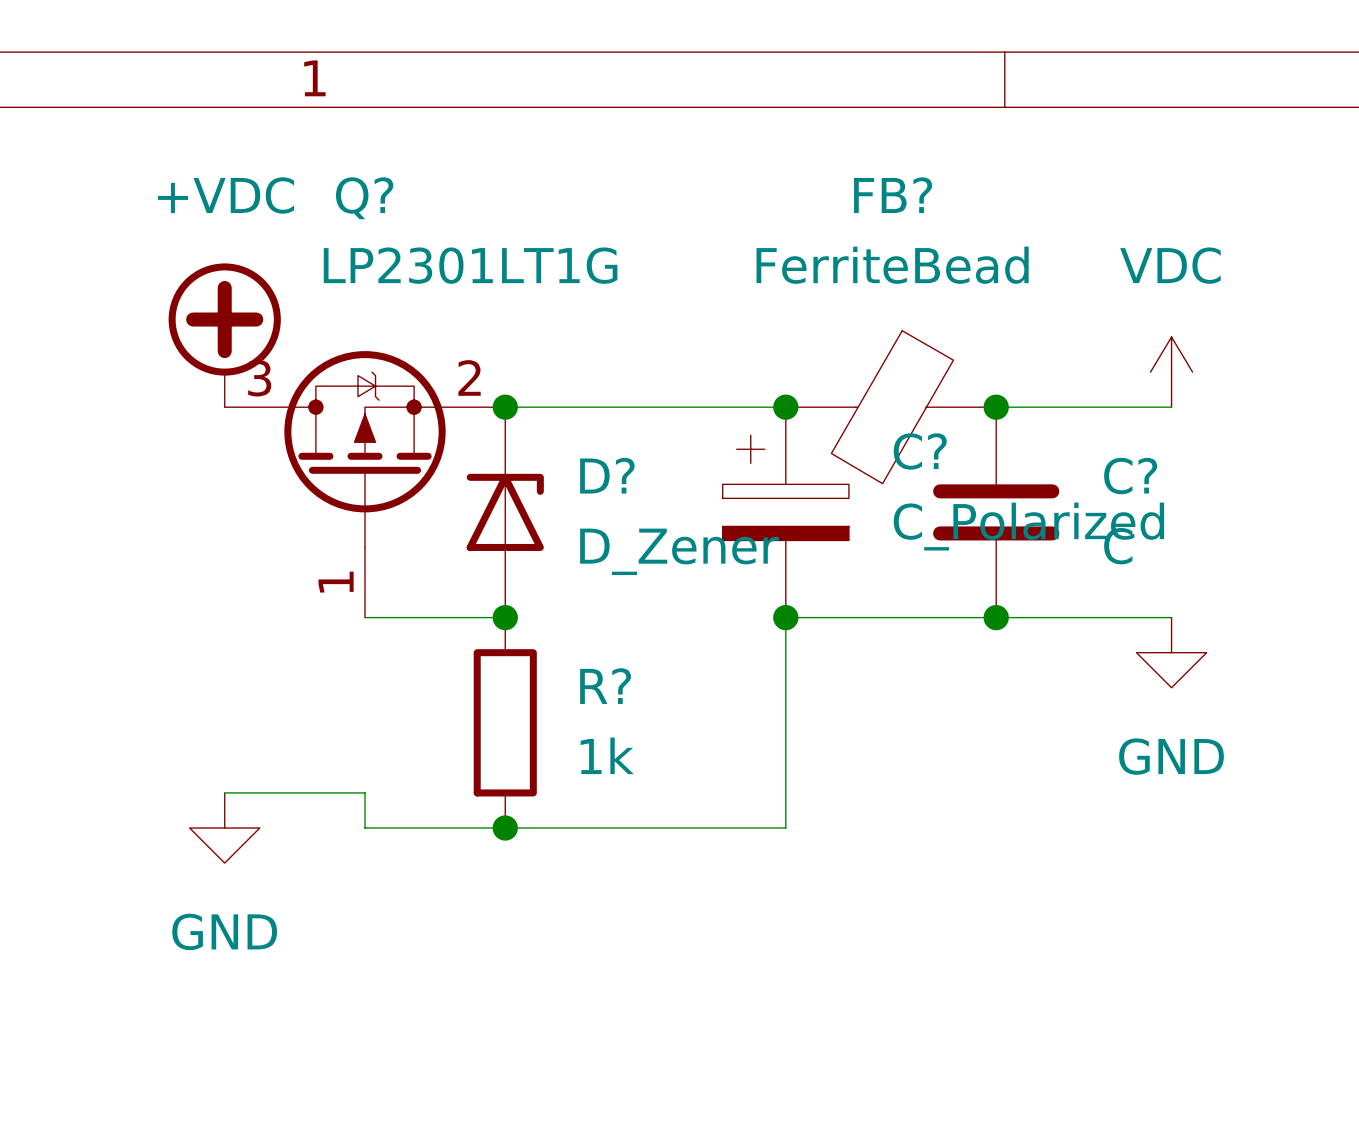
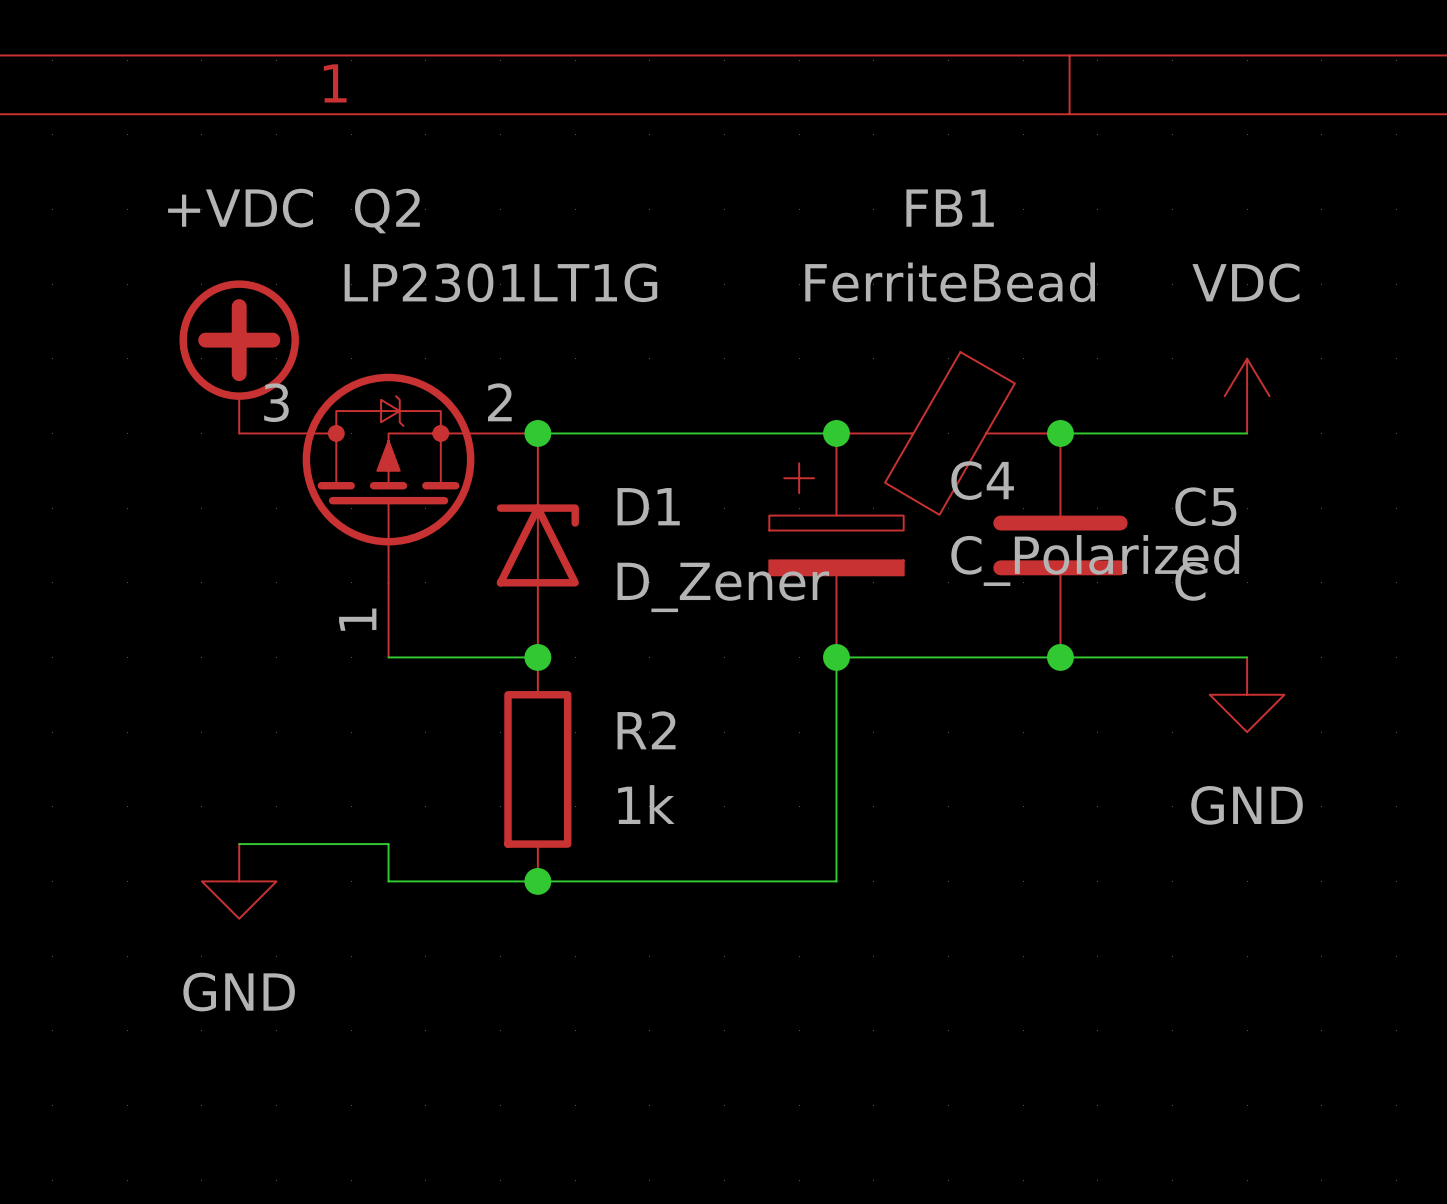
FB? name: FB? (893, 195) -> FB1 (950, 208)
Q? name: Q? (364, 198) -> Q2 (387, 211)
C? name: C? (920, 451) -> C4 (982, 480)
D? name: D? (607, 475) -> D1 (648, 506)
C? name: C? (1130, 476) -> C5 (1205, 506)
R? name: R? (605, 686) -> R2 (646, 730)

